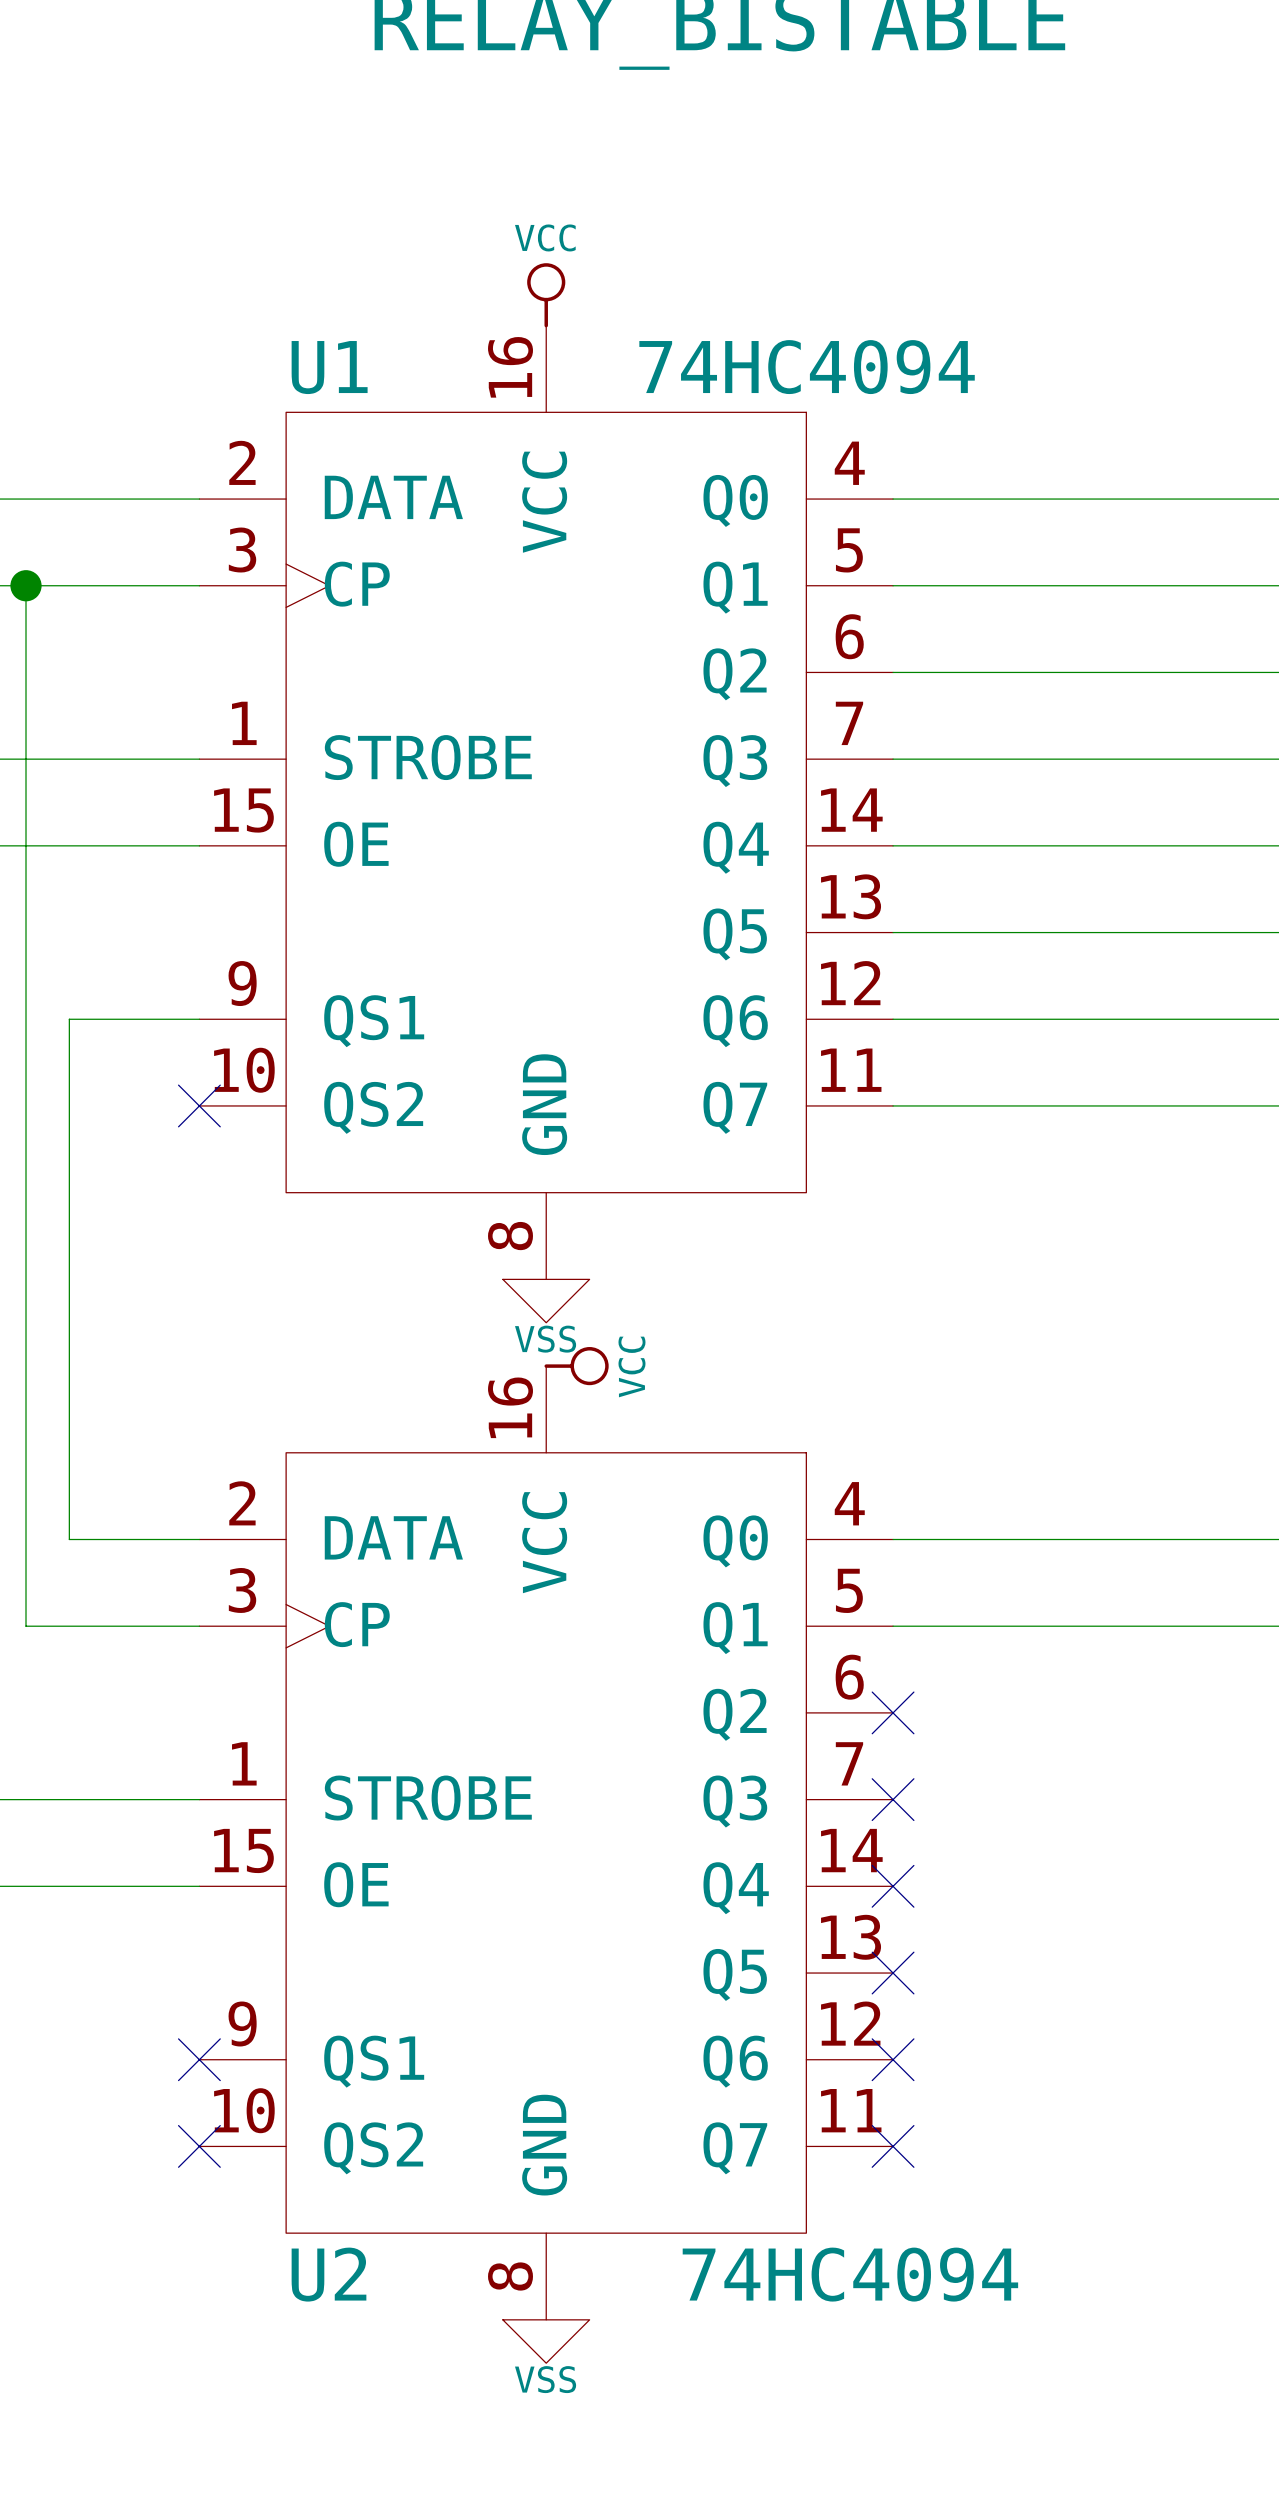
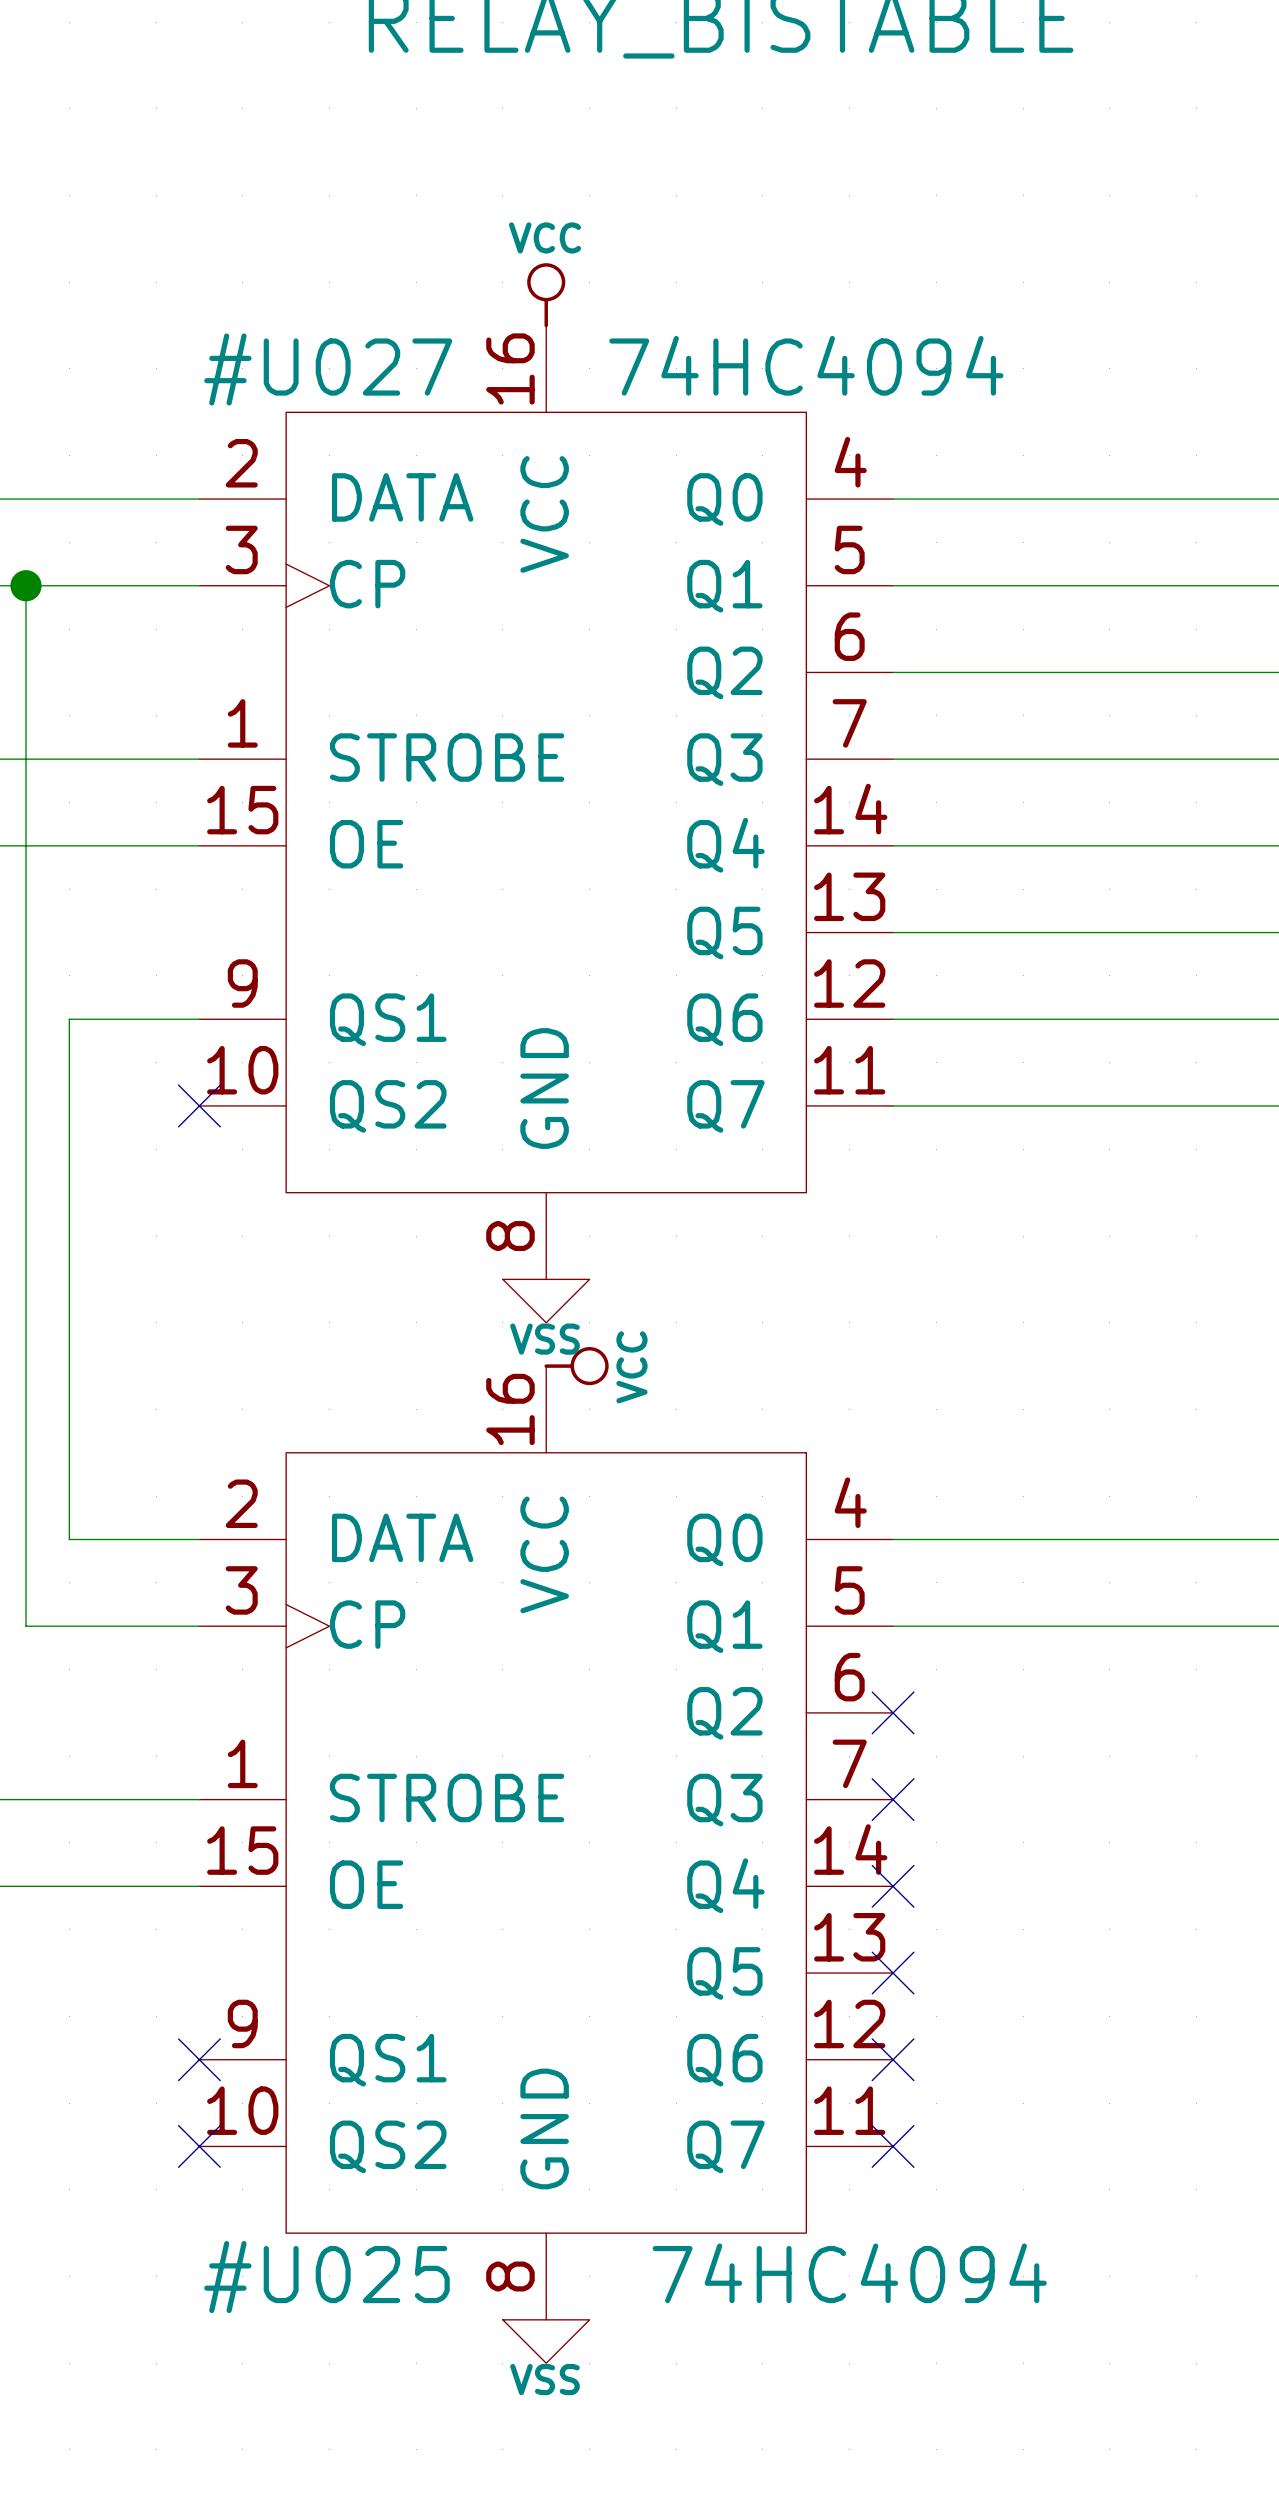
drawing: none -> [199, 325, 894, 1280]
U1: 74HC4094 (546, 802) -> none
drawing: none -> [199, 1366, 894, 2320]
U2: 74HC4094 (546, 1842) -> none

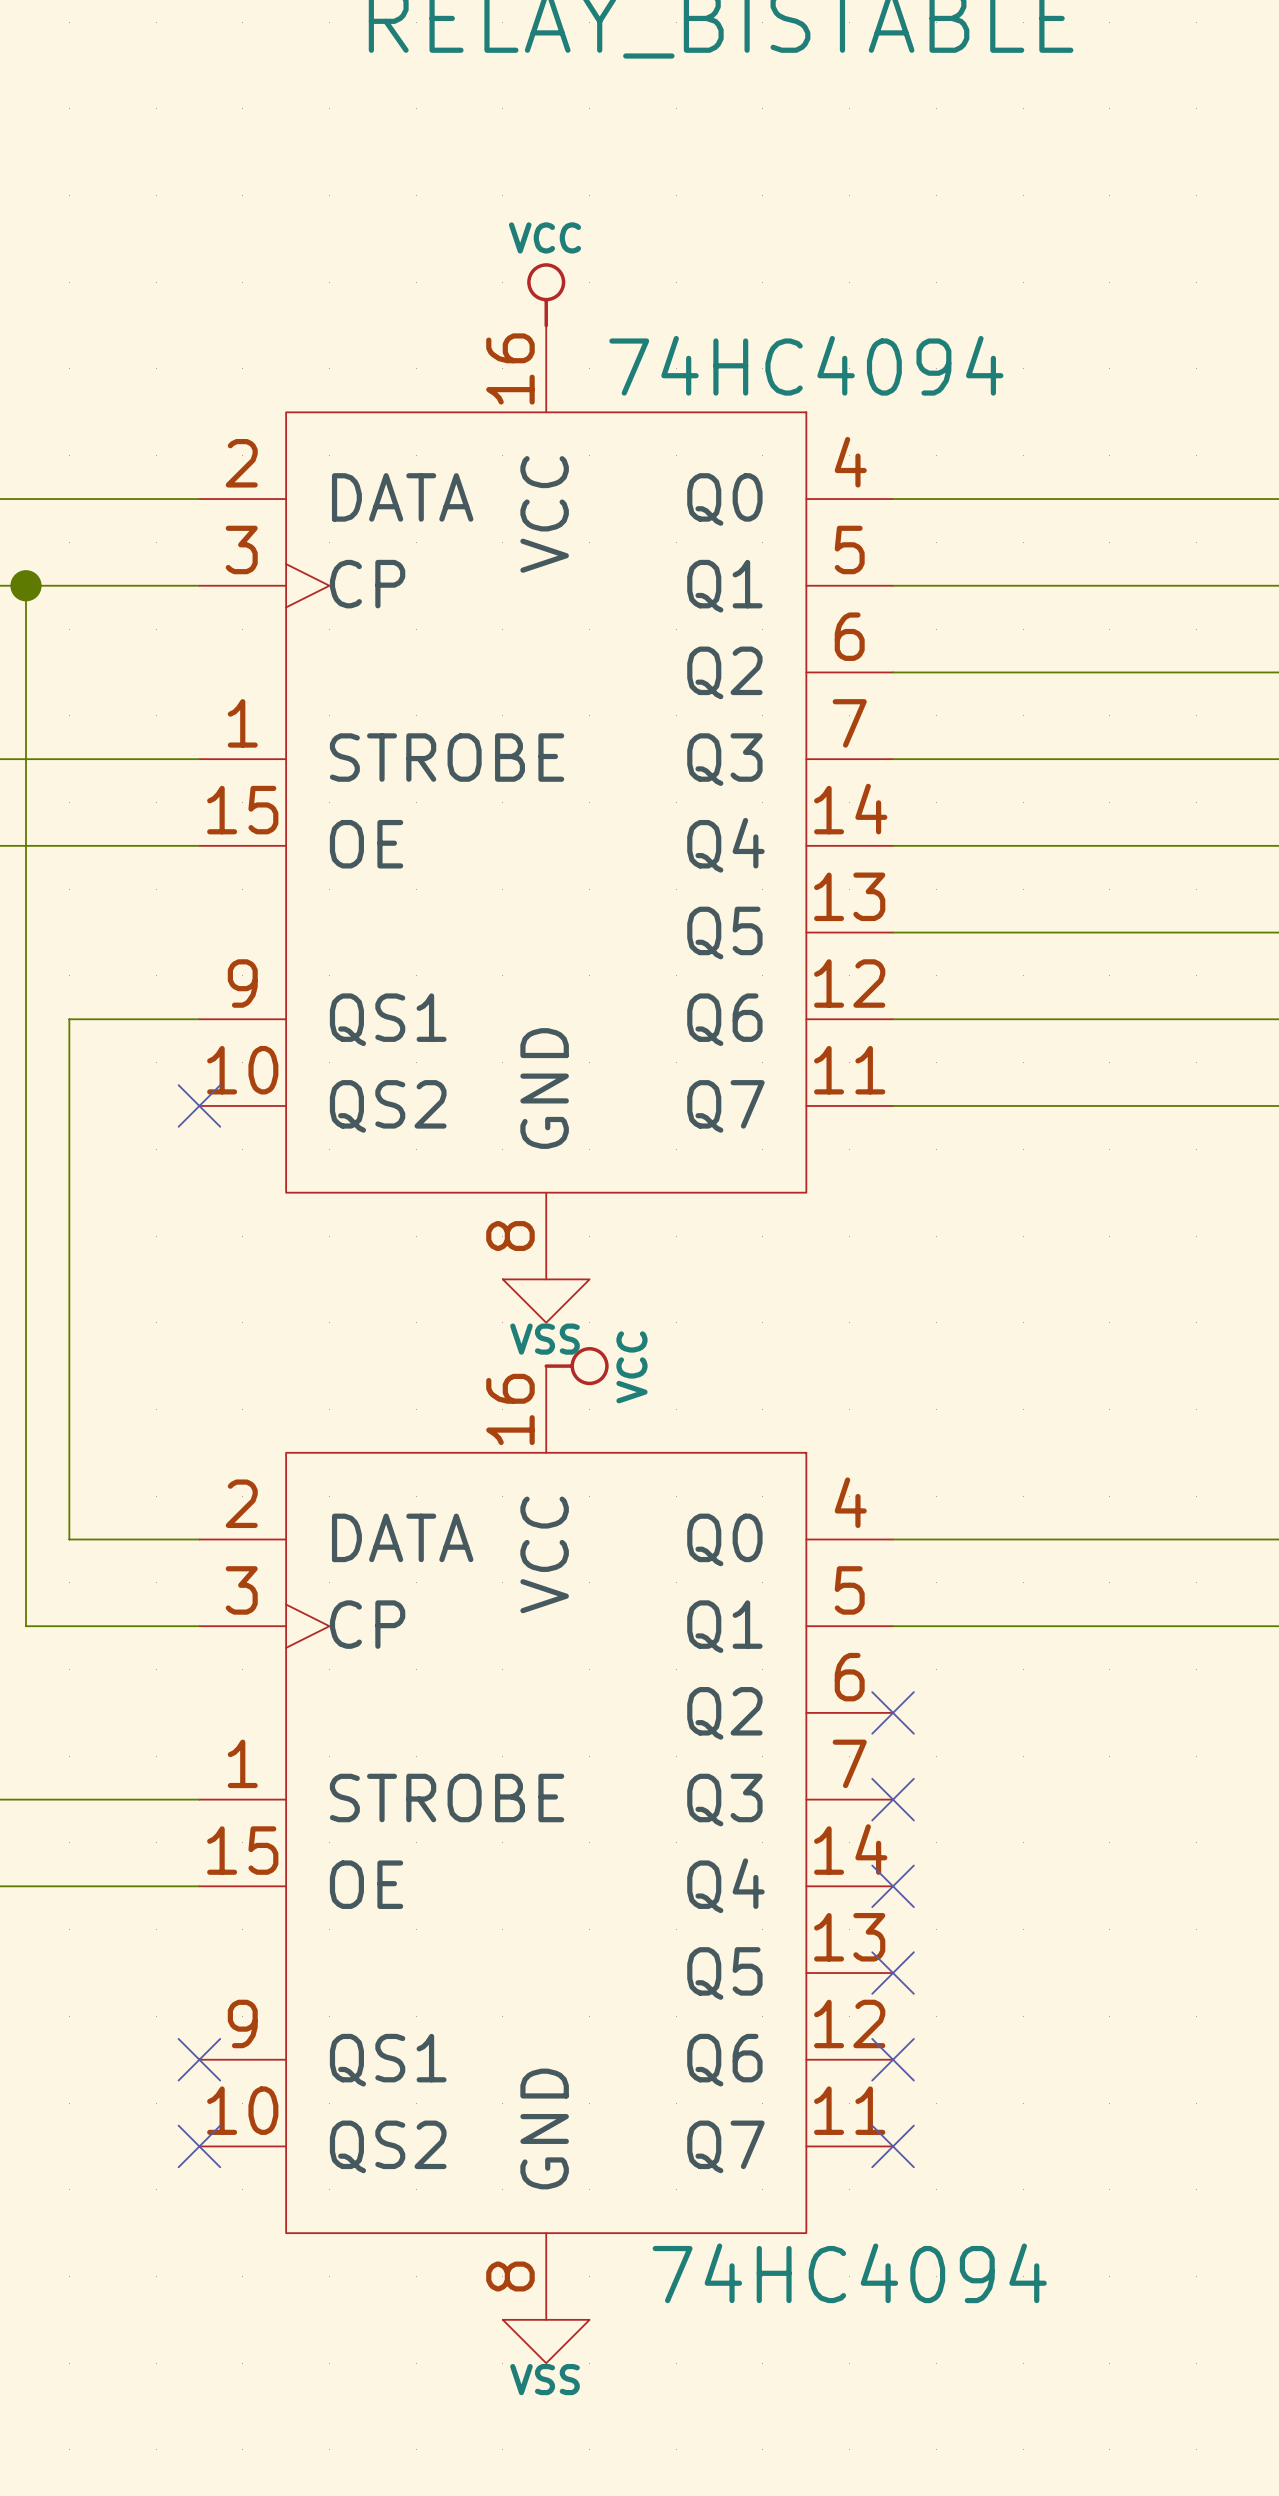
drawing shape: [199, 325, 1004, 1280] -> [199, 325, 1004, 1280]
drawing shape: [199, 1366, 1047, 2320] -> [199, 1366, 1047, 2320]

